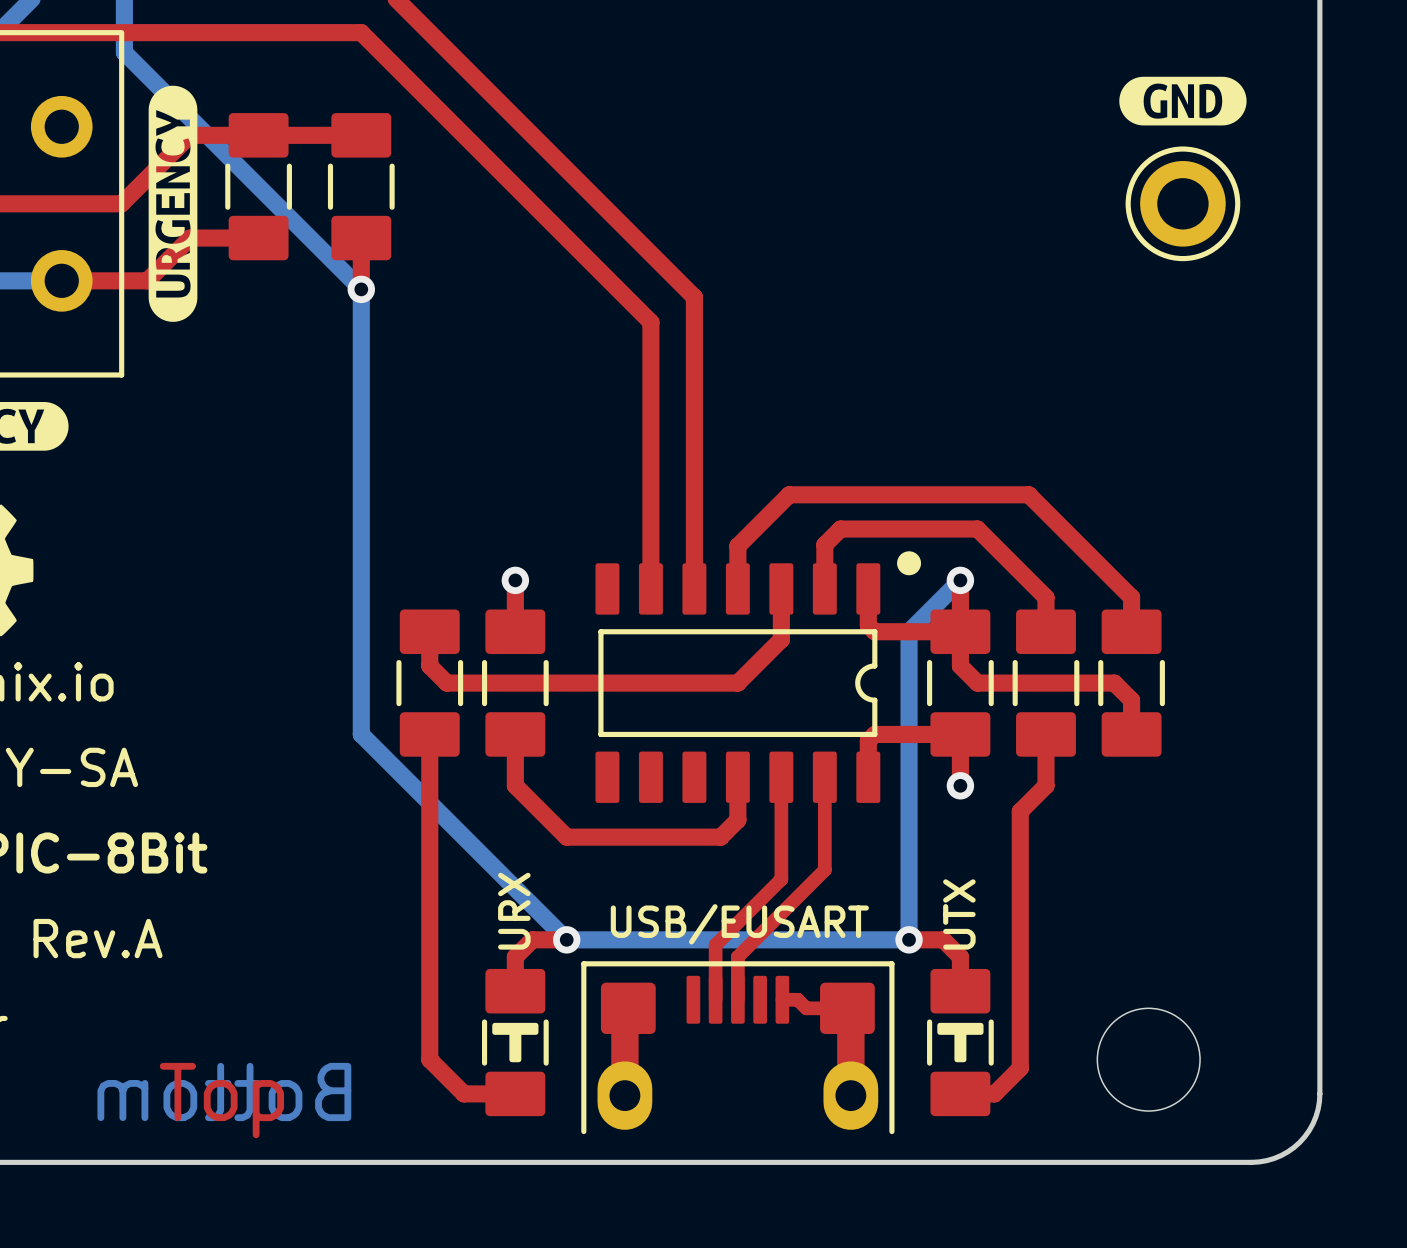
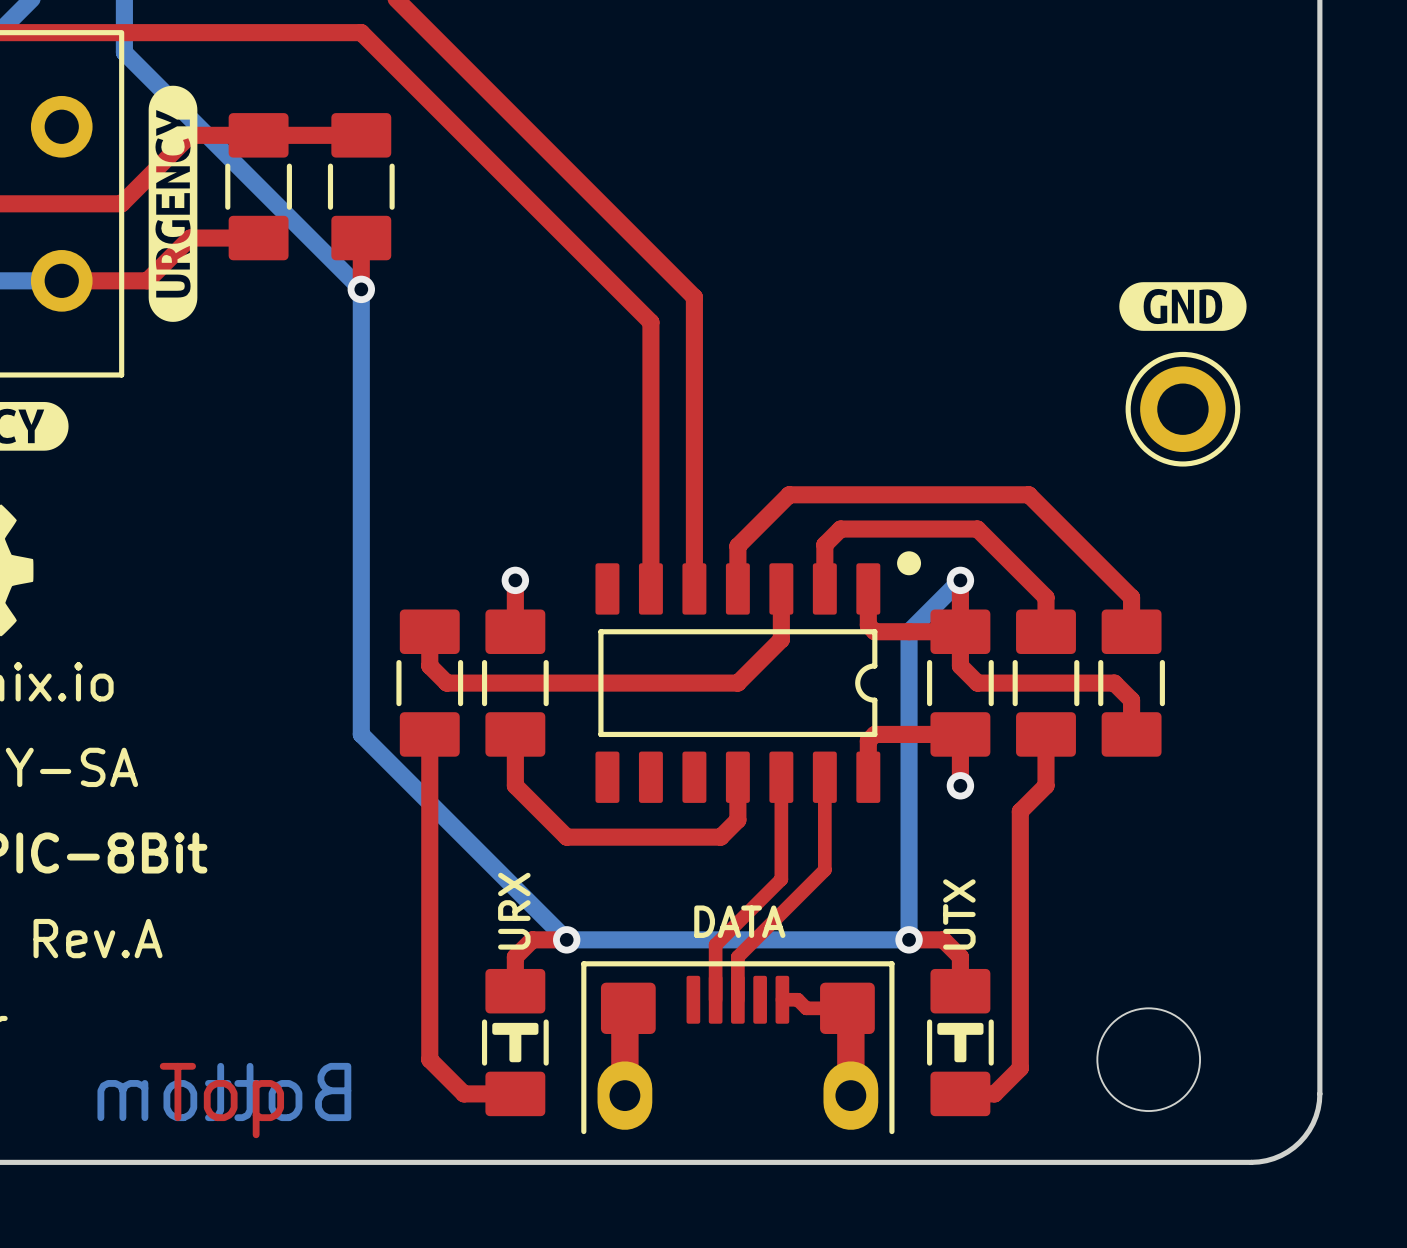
drawing position: (1182, 101) -> (1182, 306)
part position: (1182, 203) -> (1182, 409)
text: USB/EUSART (739, 924) -> DATA (739, 921)

